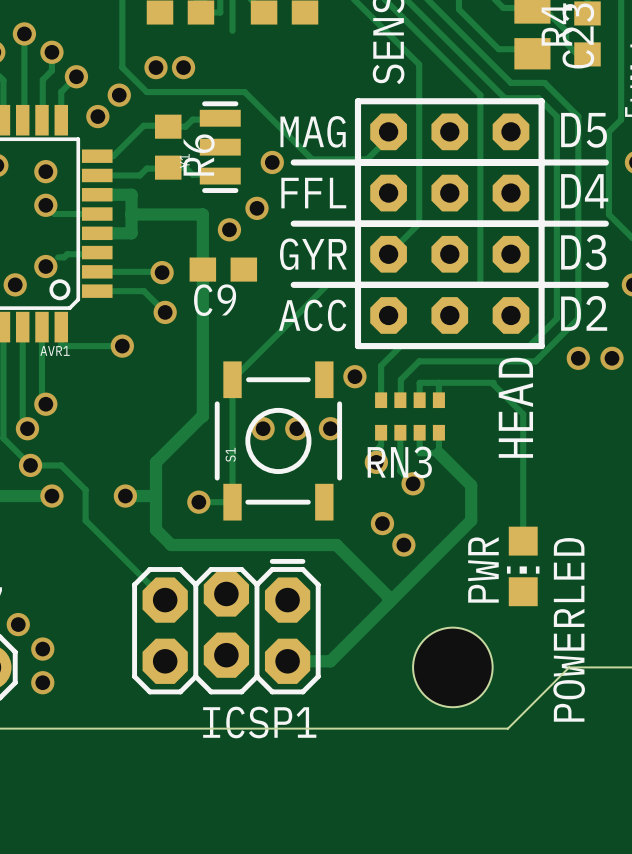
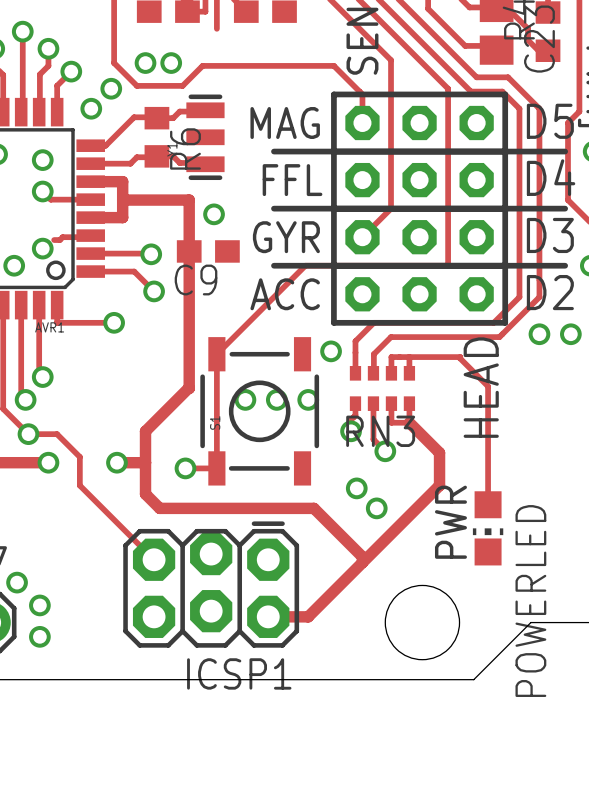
track: (195, 92) (244, 92) (312, 159) (367, 159) (388, 137) (388, 131) -> (182, 85) (202, 65) (333, 65) (362, 94) (362, 123)
via: (272, 162) -> none
via: (256, 208) -> none

